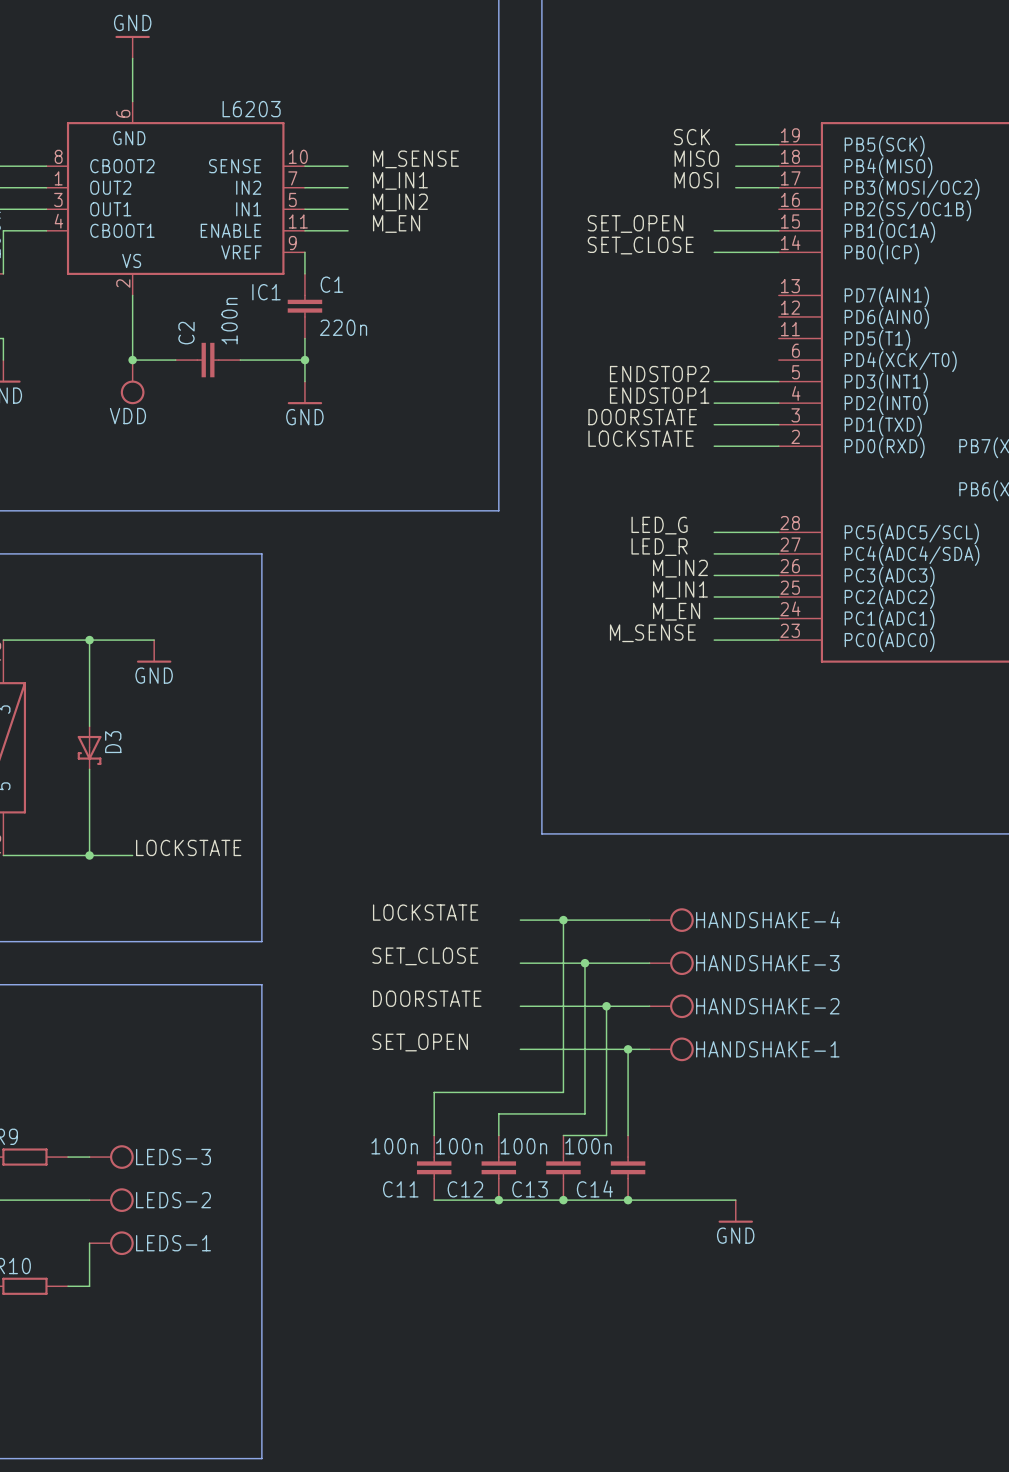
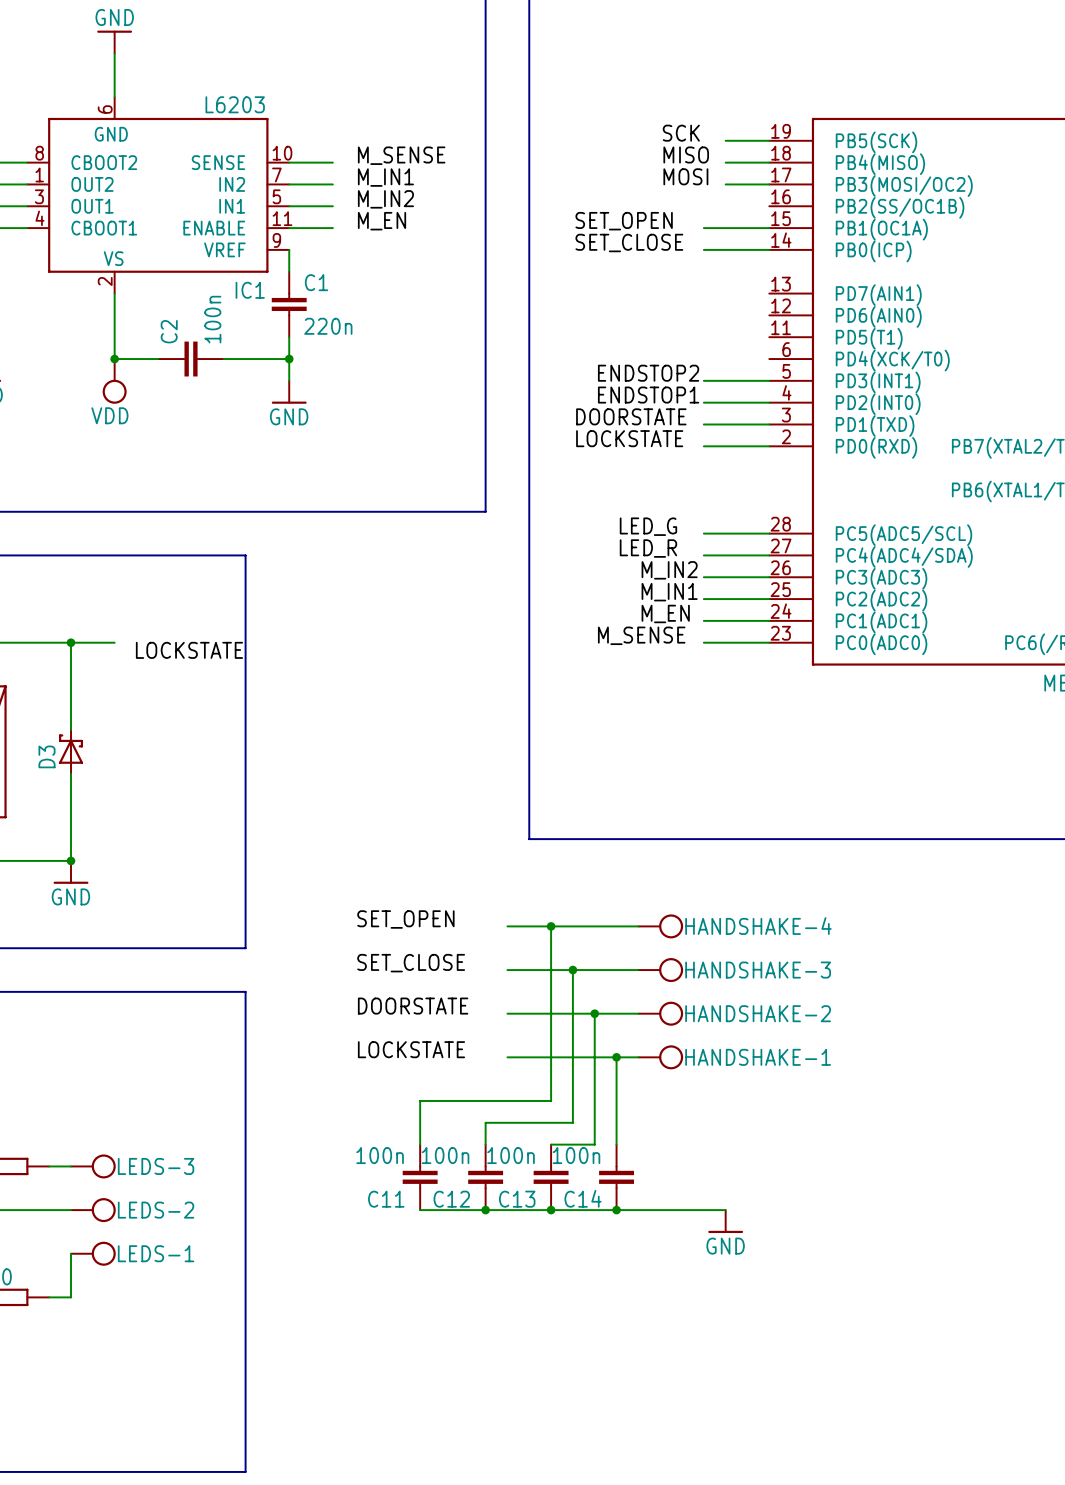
wire: (132, 640) (154, 640) -> none
label: none -> LOCKSTATE (189, 650)
power symbol: GND (154, 651) -> none
D3 rotation: 0° (89, 750) -> 180° (71, 749)
label: LOCKSTATE (188, 847) -> none
wire: (89, 855) (132, 855) -> none
power symbol: none -> GND (71, 872)
label: LOCKSTATE (425, 912) -> SET_OPEN (405, 919)
label: SET_OPEN (420, 1042) -> LOCKSTATE (411, 1049)

